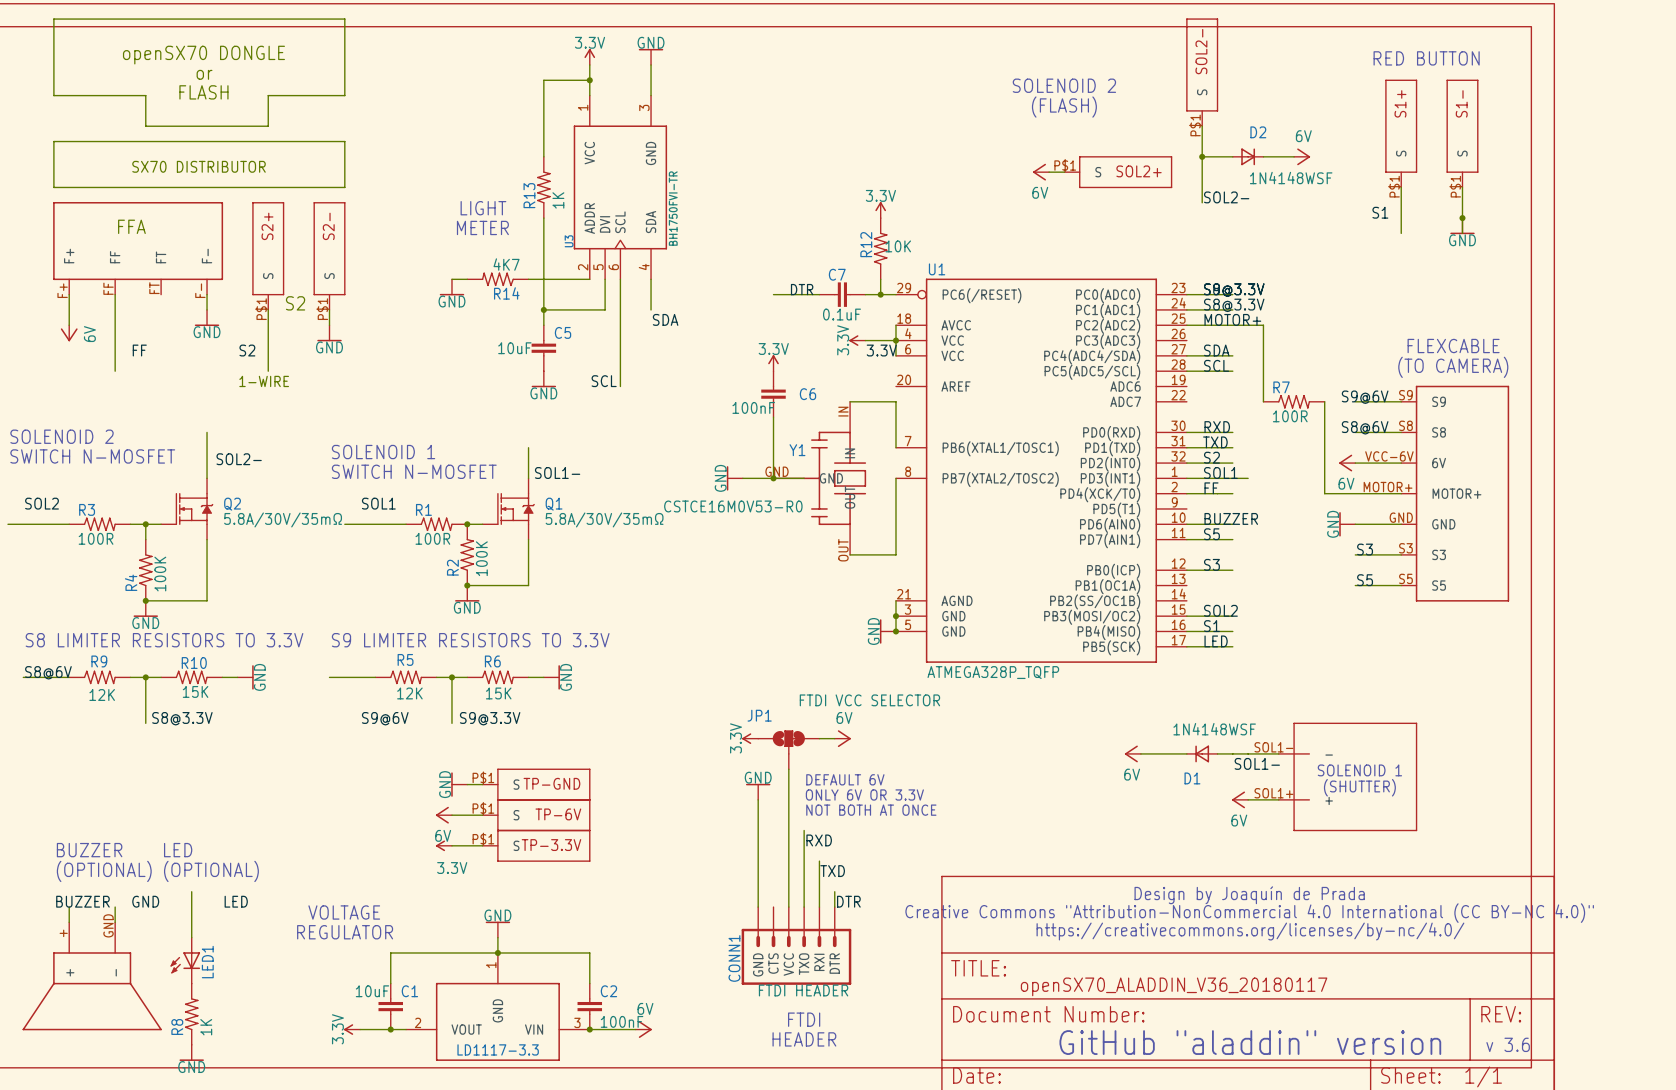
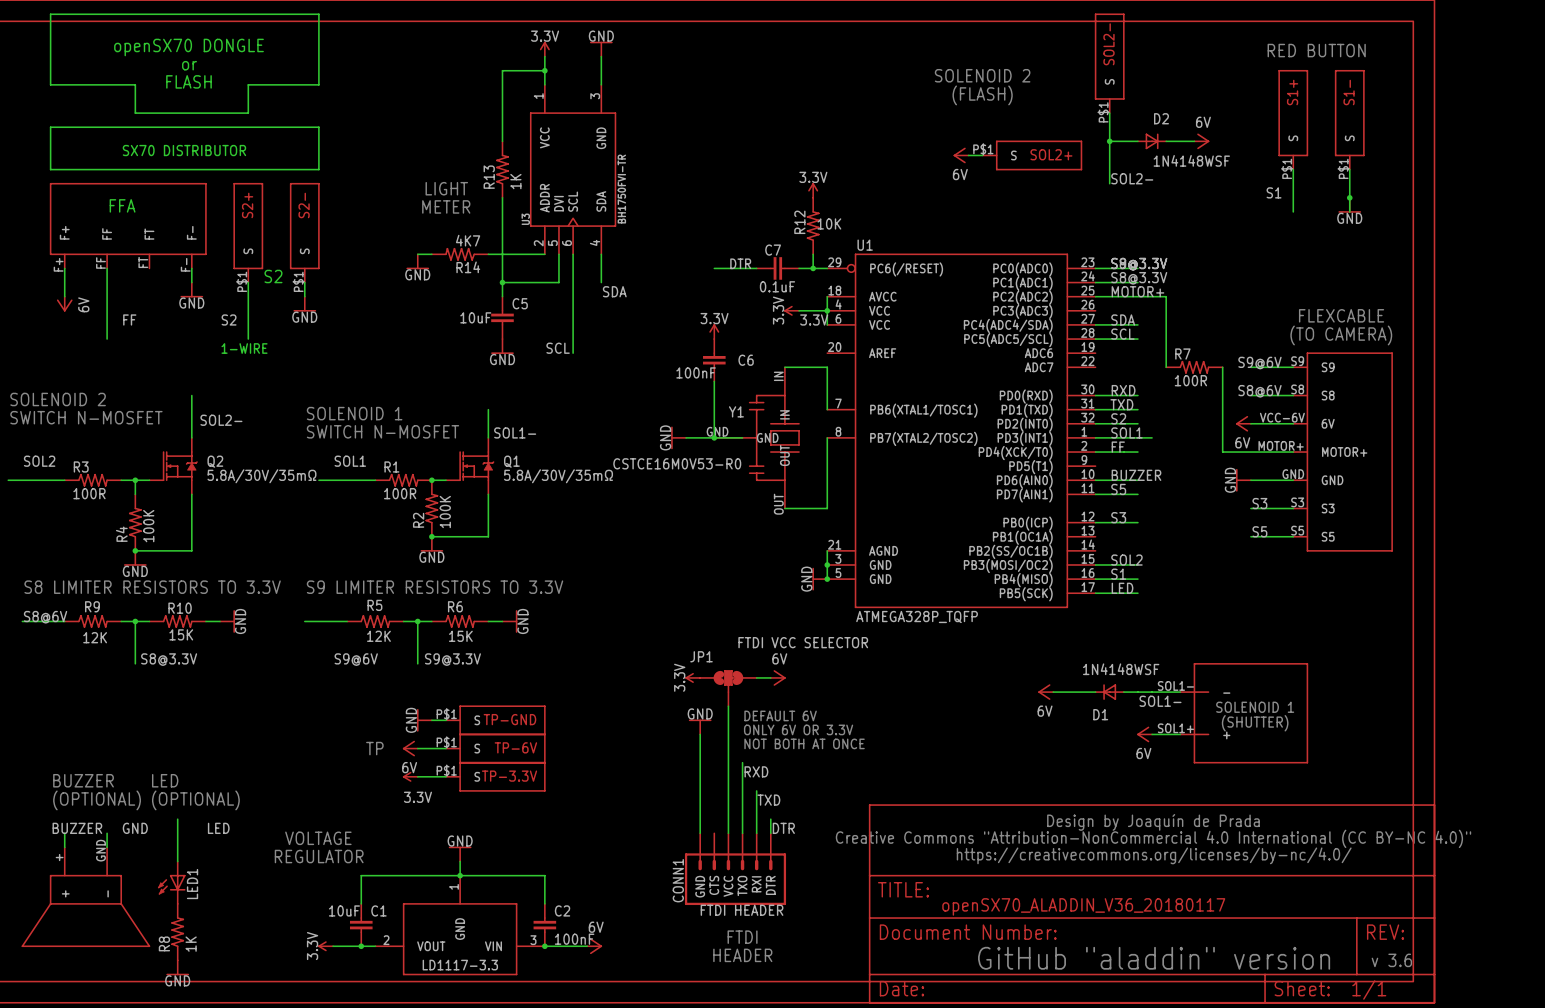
text: none -> TP (374, 748)

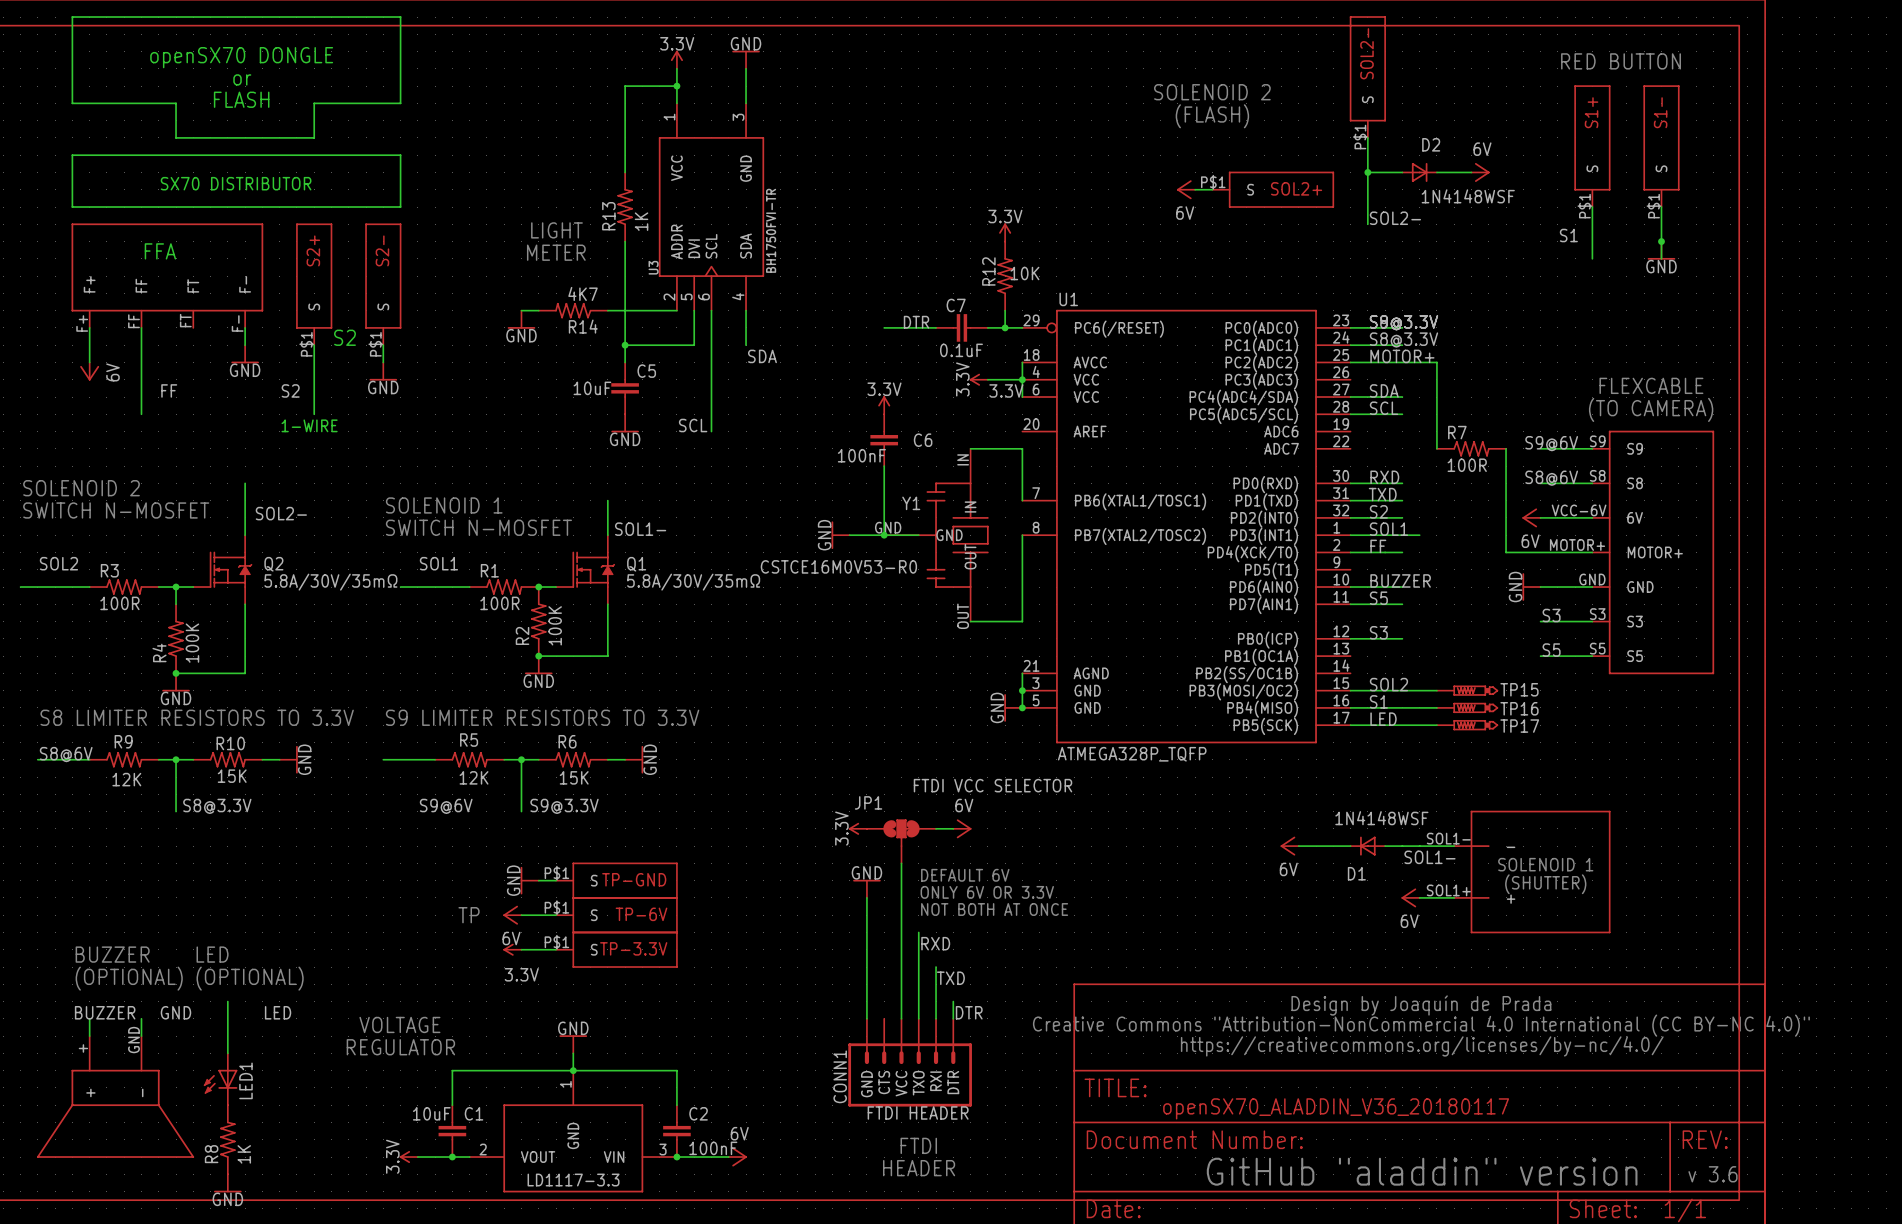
wire: none -> (1402, 690) (1436, 690)
TP15: none -> (1467, 690)
wire: none -> (1402, 707) (1436, 707)
TP16: none -> (1467, 707)
wire: none -> (1402, 725) (1436, 725)
TP17: none -> (1467, 725)

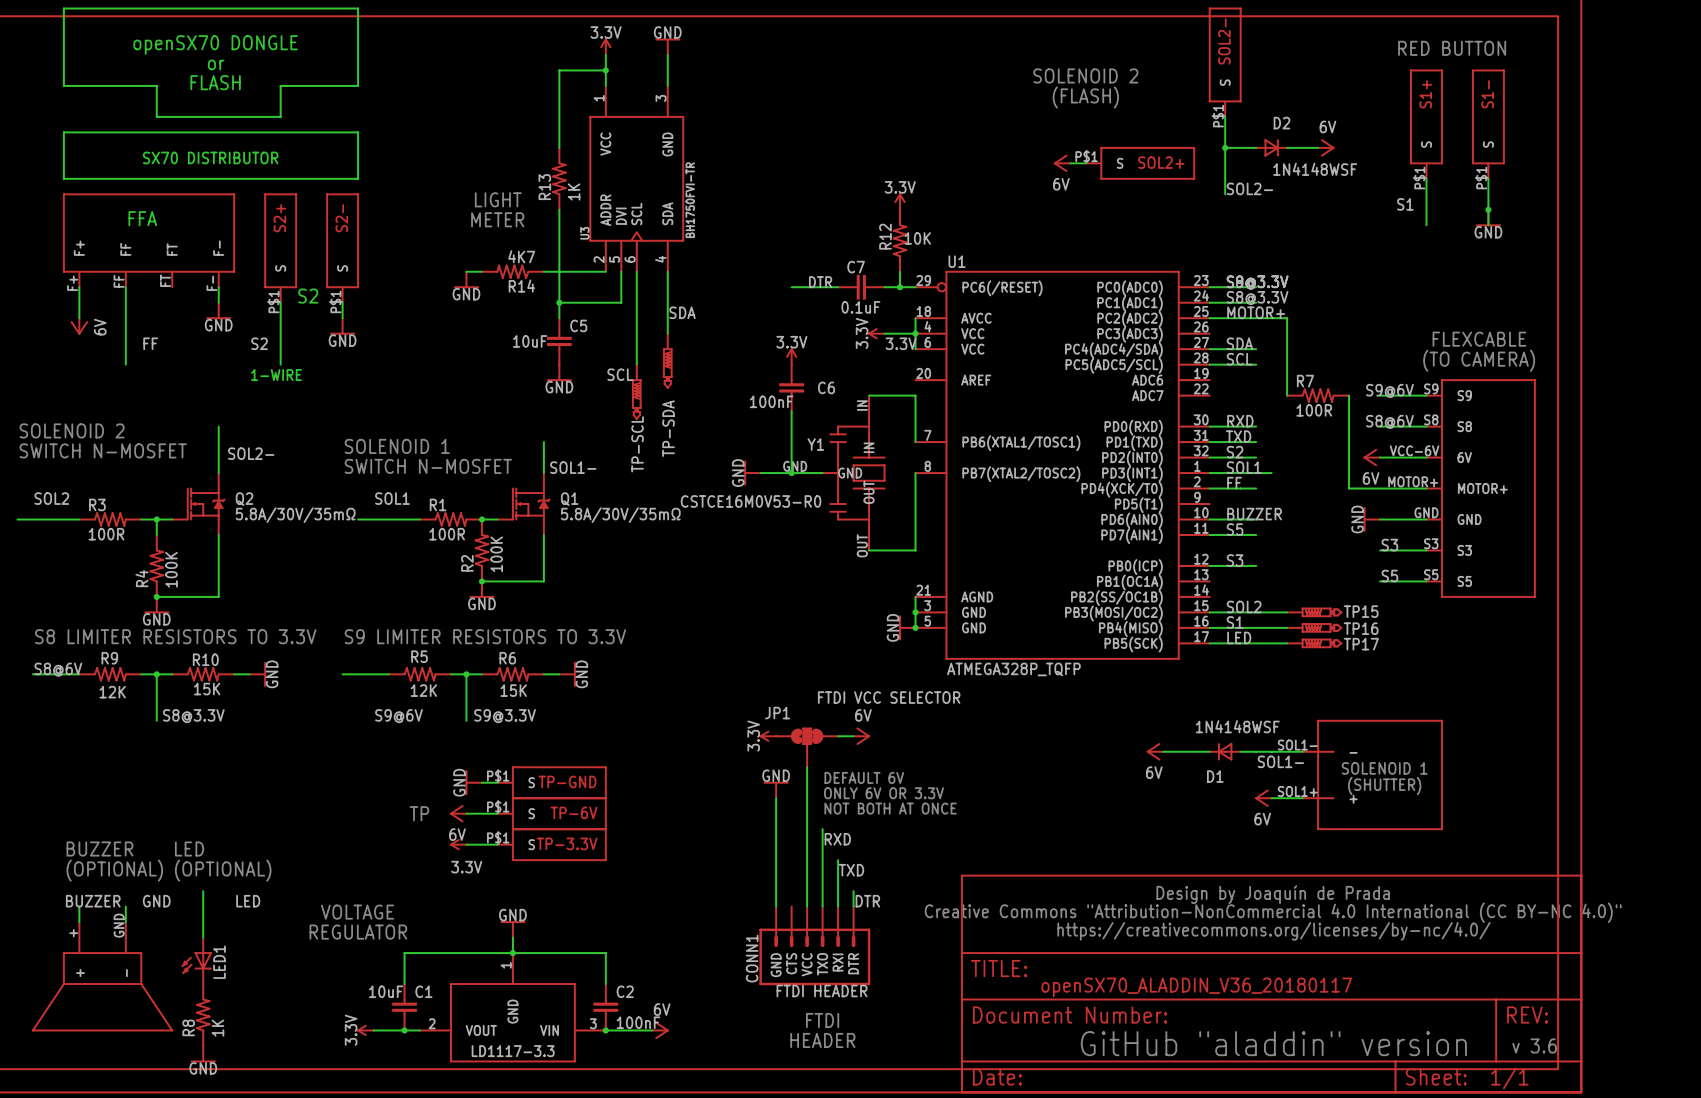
wire: none -> (667, 302) (667, 333)
TP-SDA: none -> (667, 361)
TP-SCL: none -> (636, 391)

